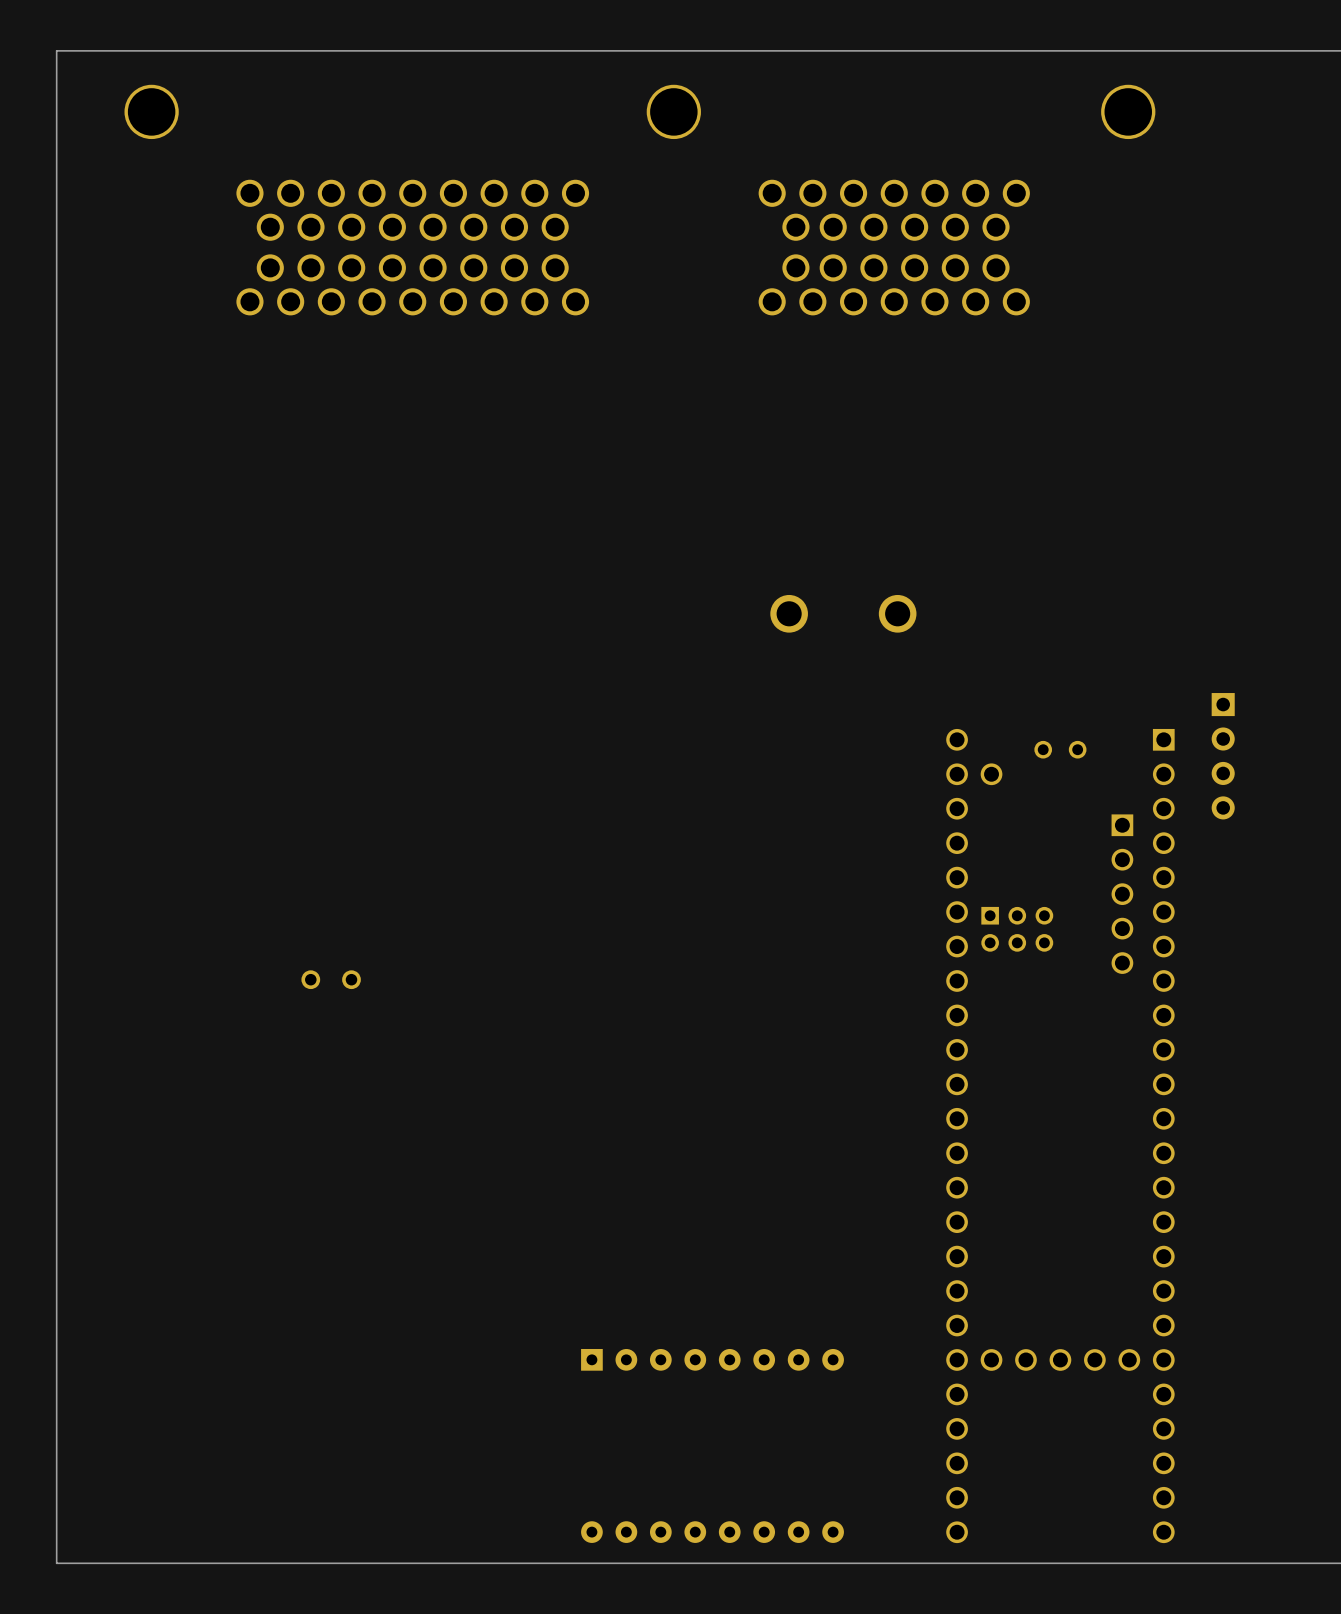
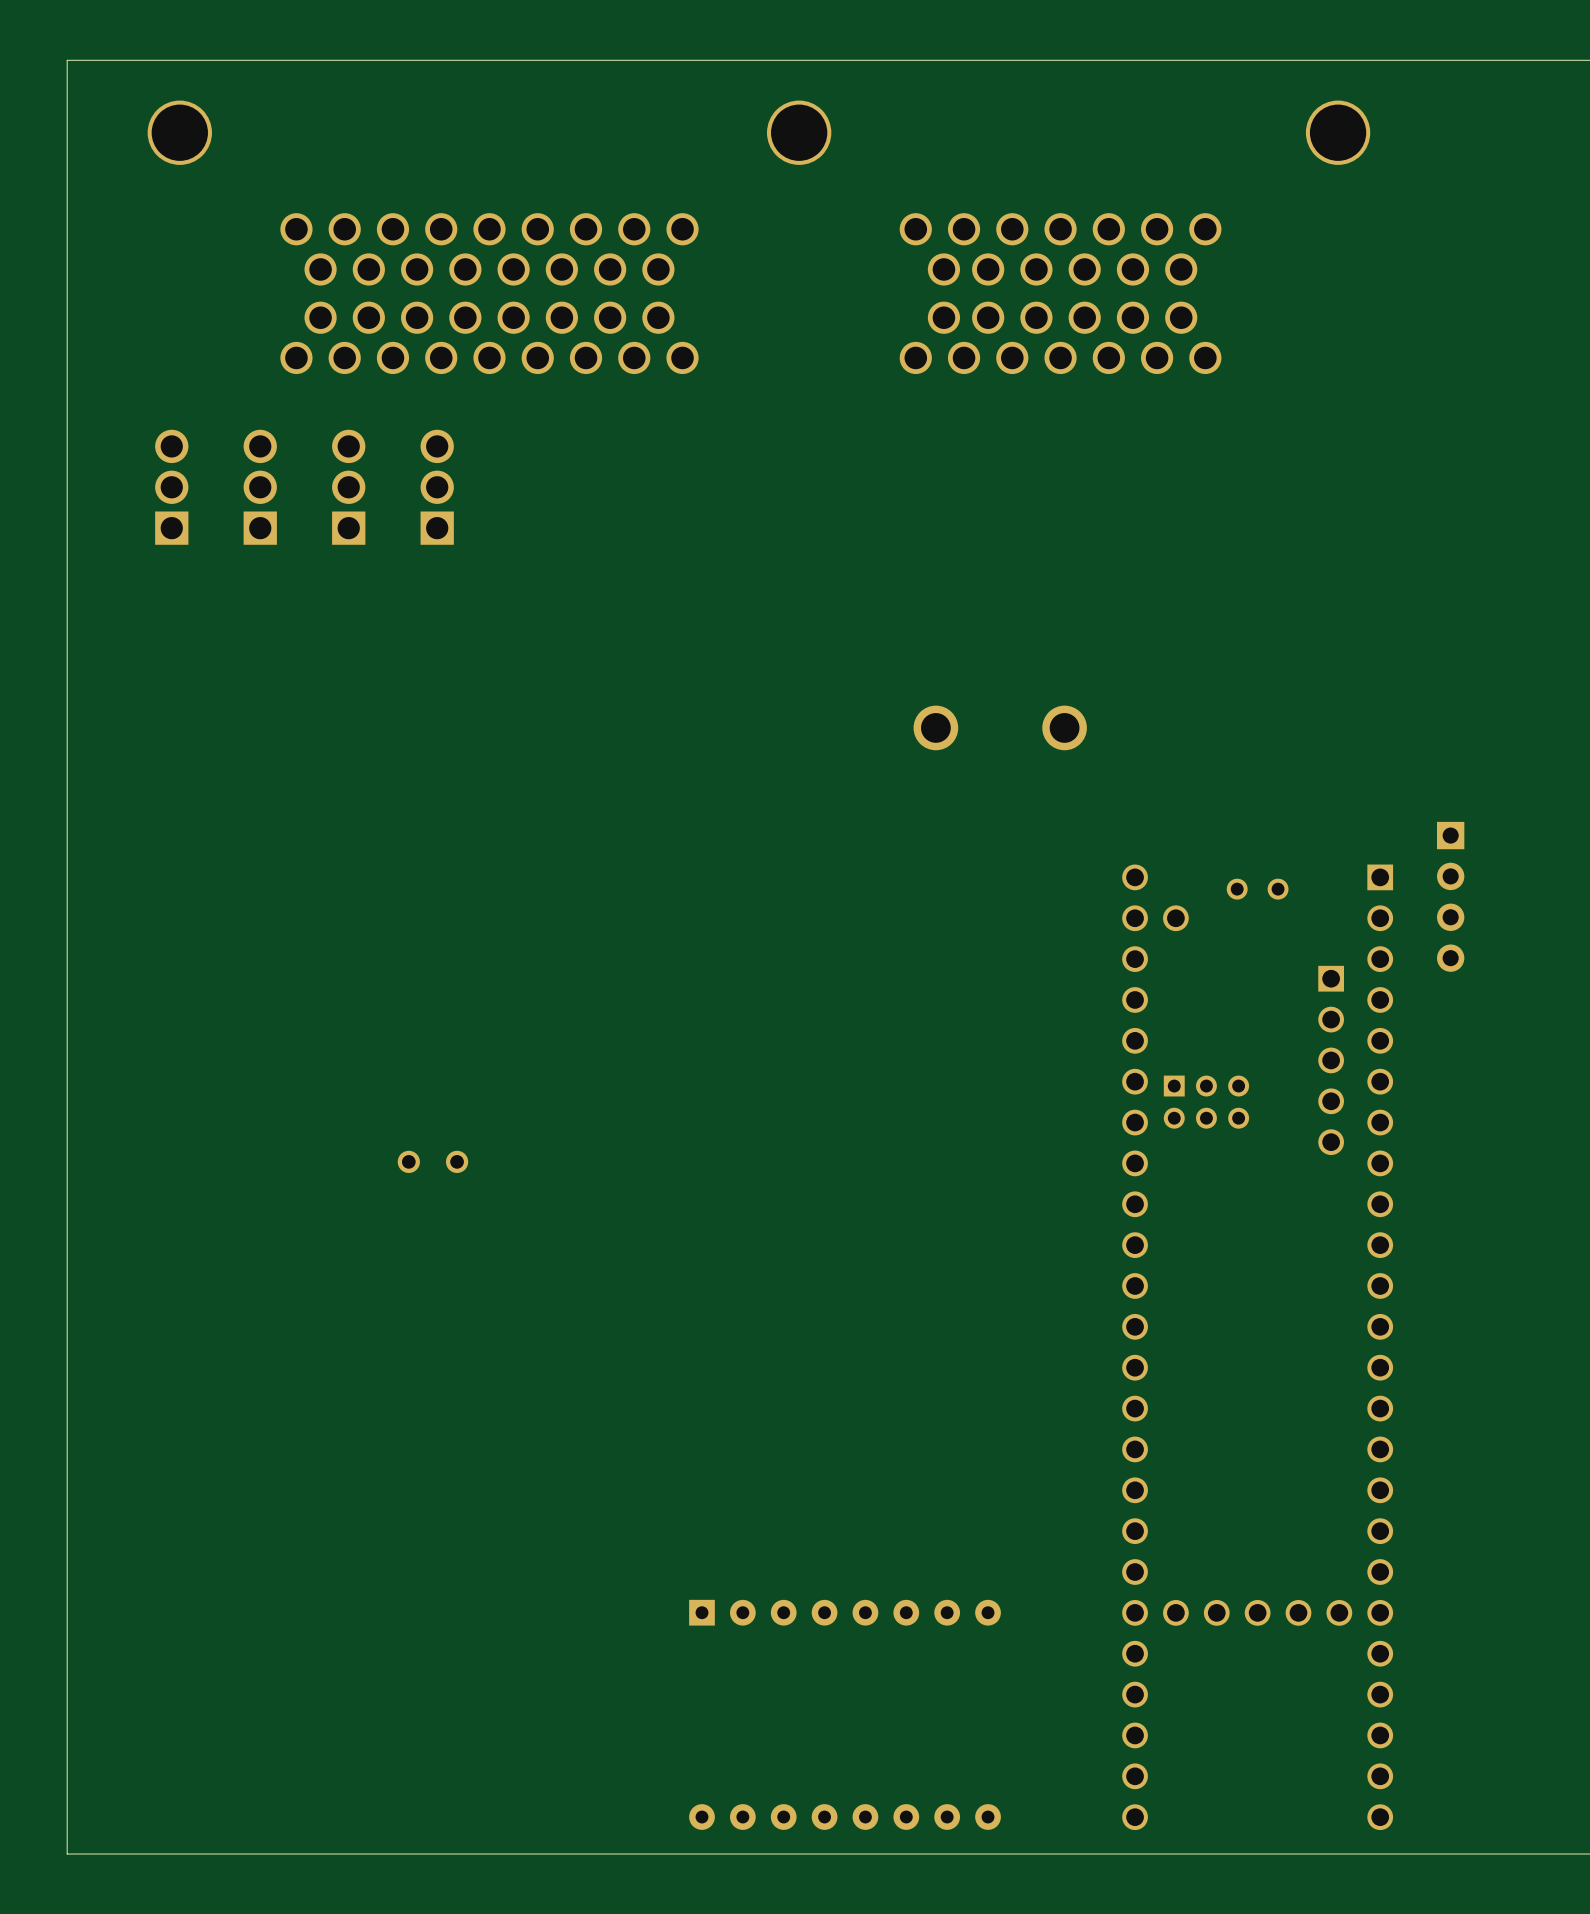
part: none -> (171, 487)
part: none -> (260, 487)
part: none -> (348, 487)
part: none -> (437, 487)
part position: (331, 979) -> (432, 1161)

